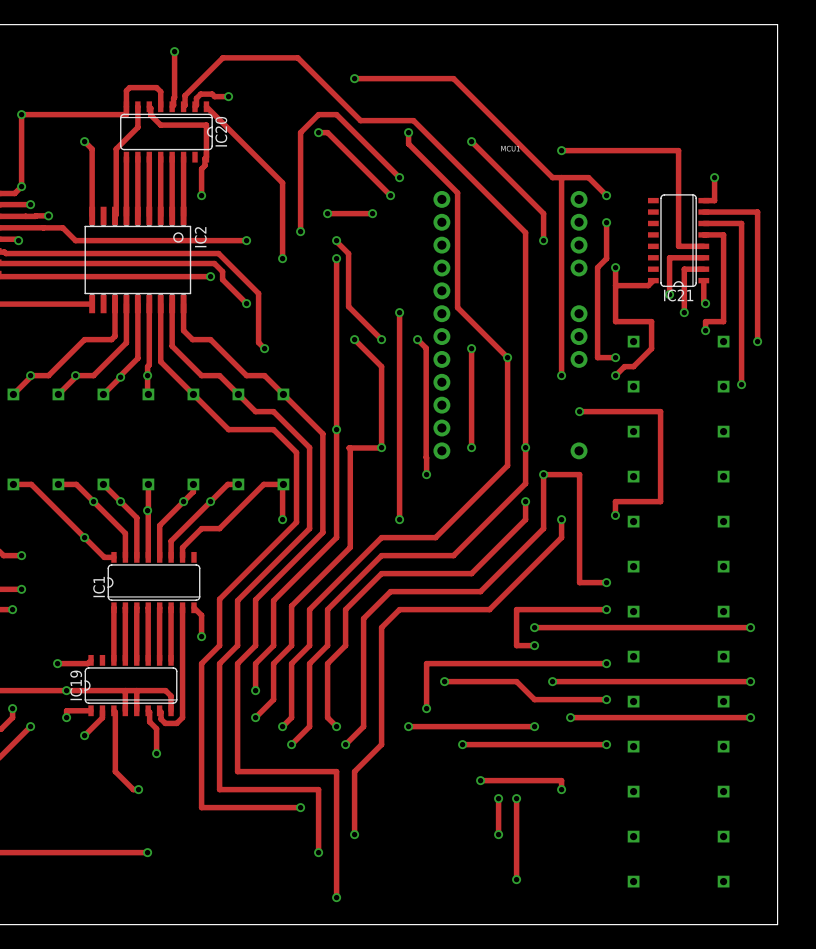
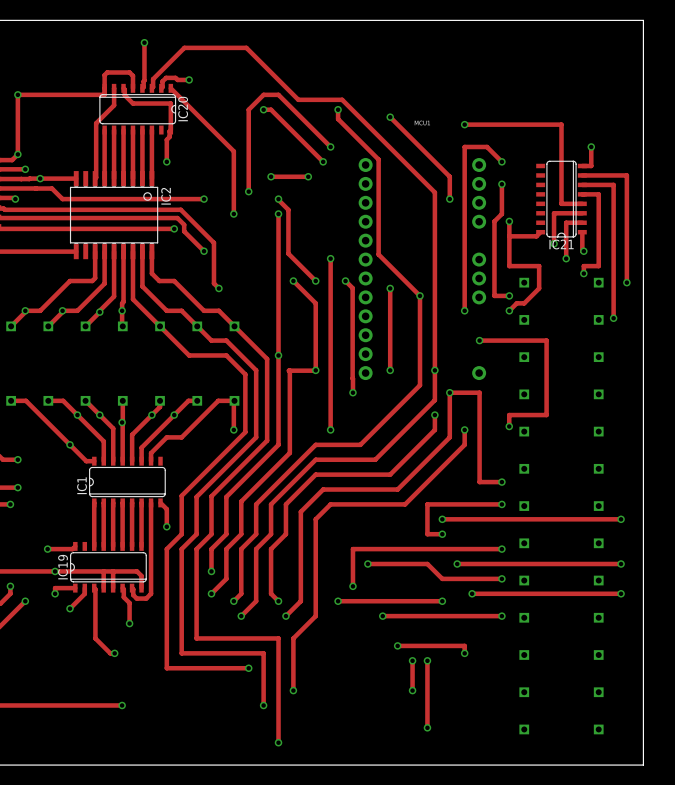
track: (354, 78) (453, 78) (552, 177) (561, 177) -> none
via: (354, 78) -> none
track: (84, 141) (92, 149) (92, 215) -> (40, 178) (76, 178)
via: (84, 141) -> none

